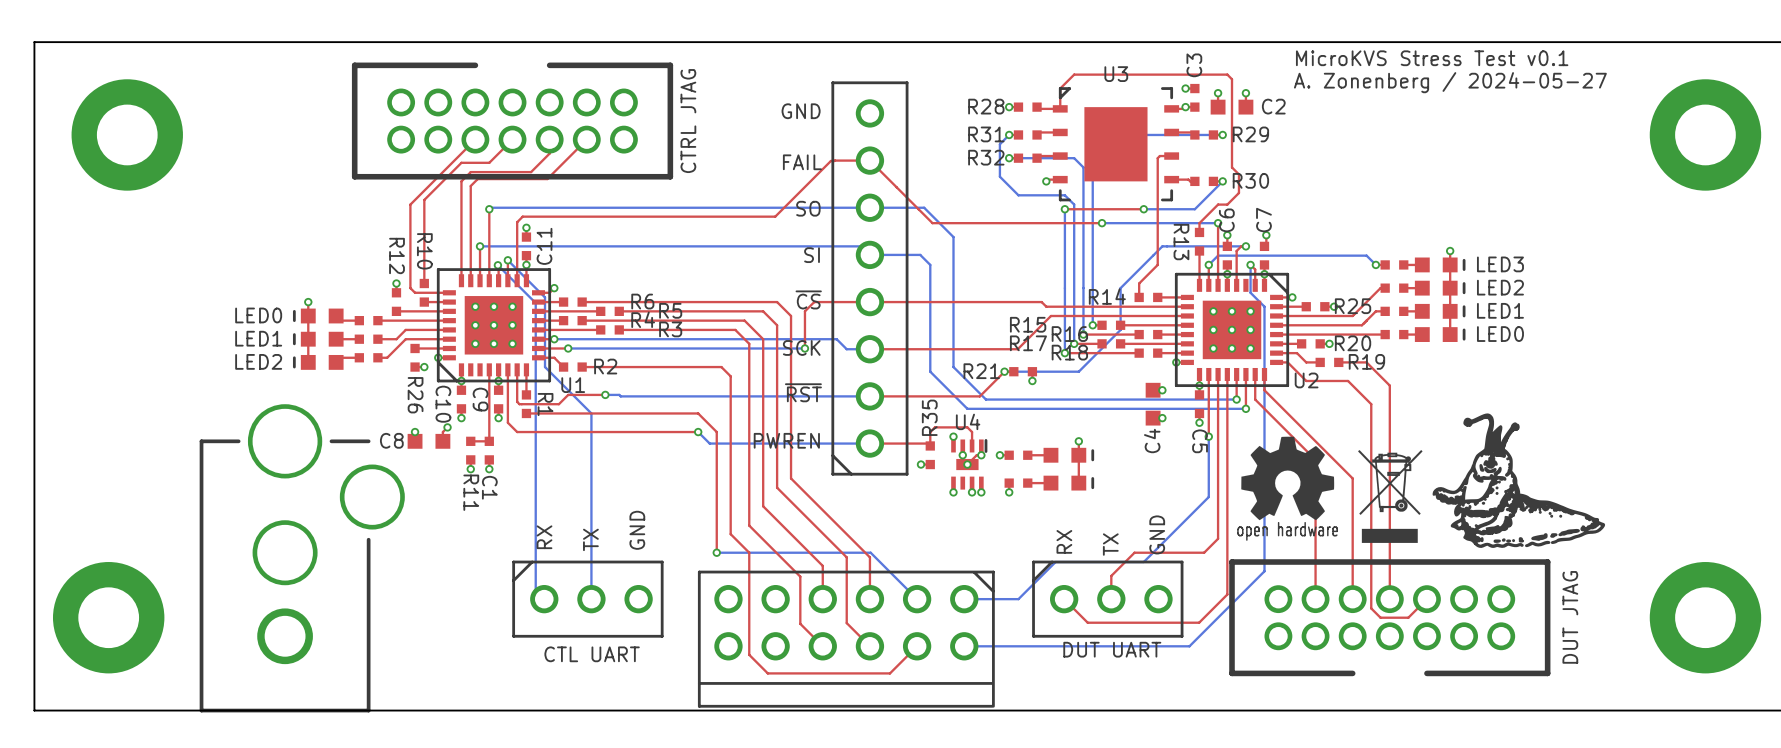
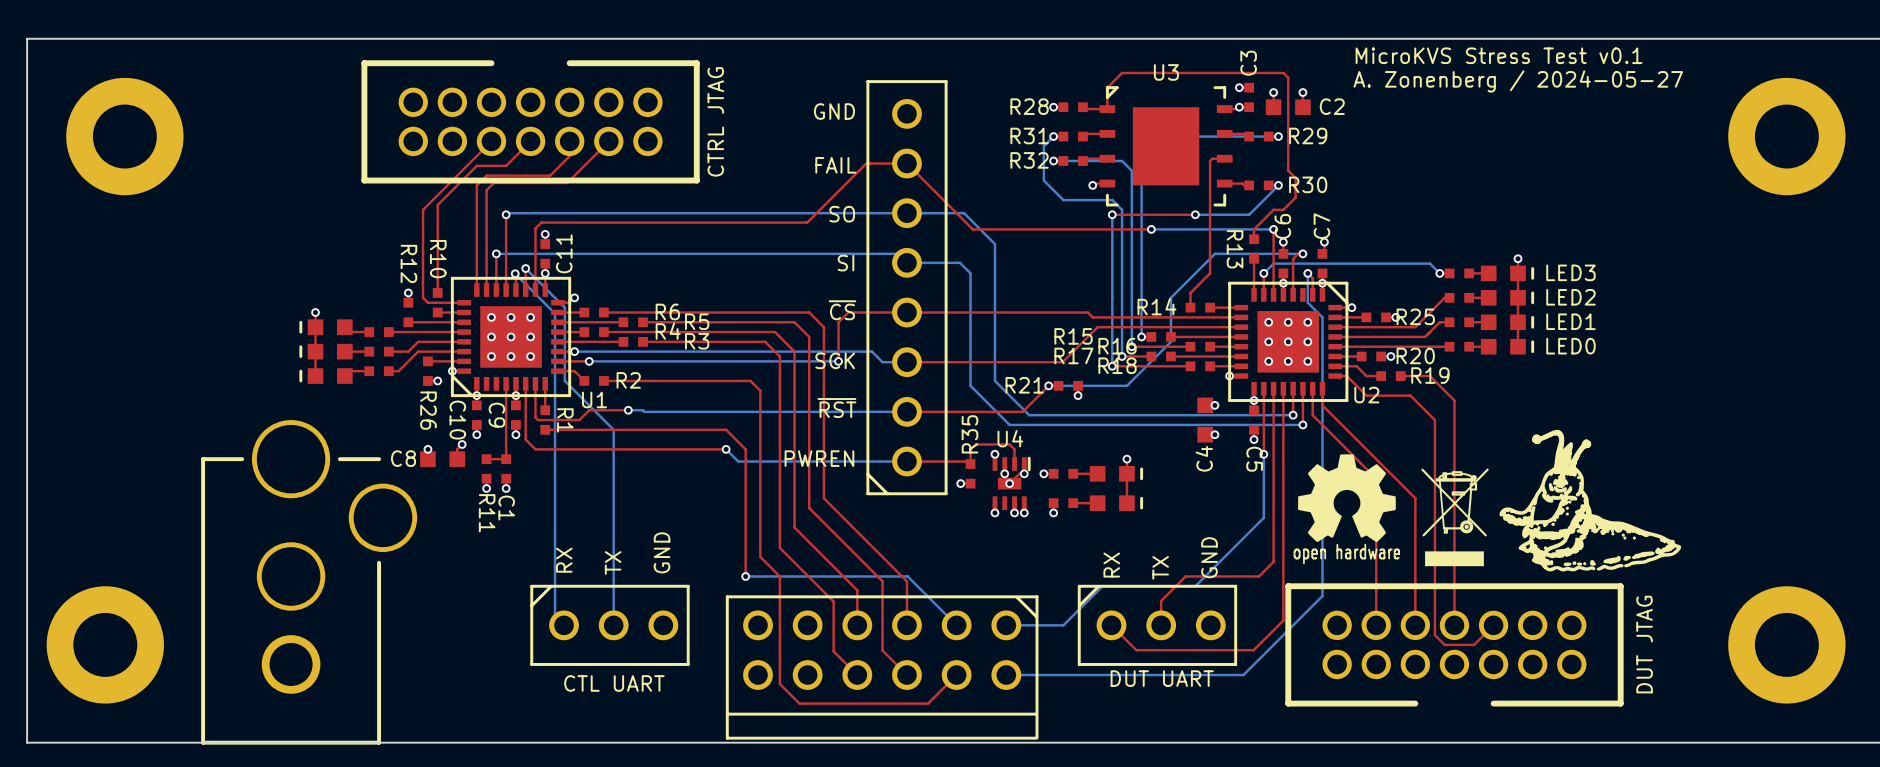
text: LED0 (258, 315) -> none
text: LED1 (258, 338) -> none
text: LED2 (258, 361) -> none

